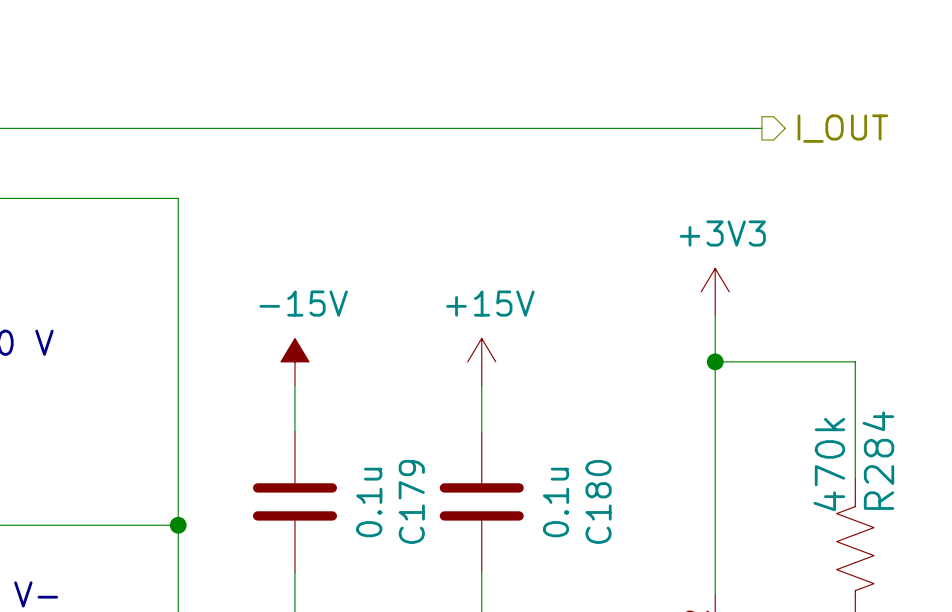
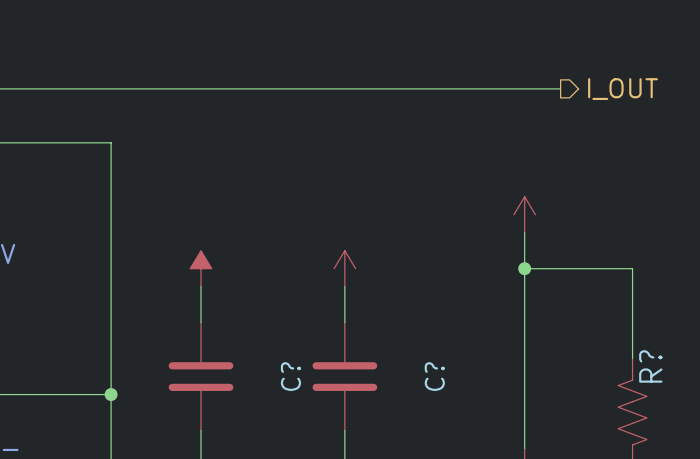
power symbol text: +3V3 (722, 233) -> none
power symbol text: -15V (303, 303) -> none
power symbol text: +15V (490, 303) -> none
R284 name: R284 (878, 460) -> R? (650, 366)
R284 value: 470k (829, 464) -> none
C179 name: C179 (411, 501) -> C? (290, 376)
C180 name: C180 (598, 501) -> C? (434, 376)
C179 value: 0.1u (369, 502) -> none
C180 value: 0.1u (556, 502) -> none

